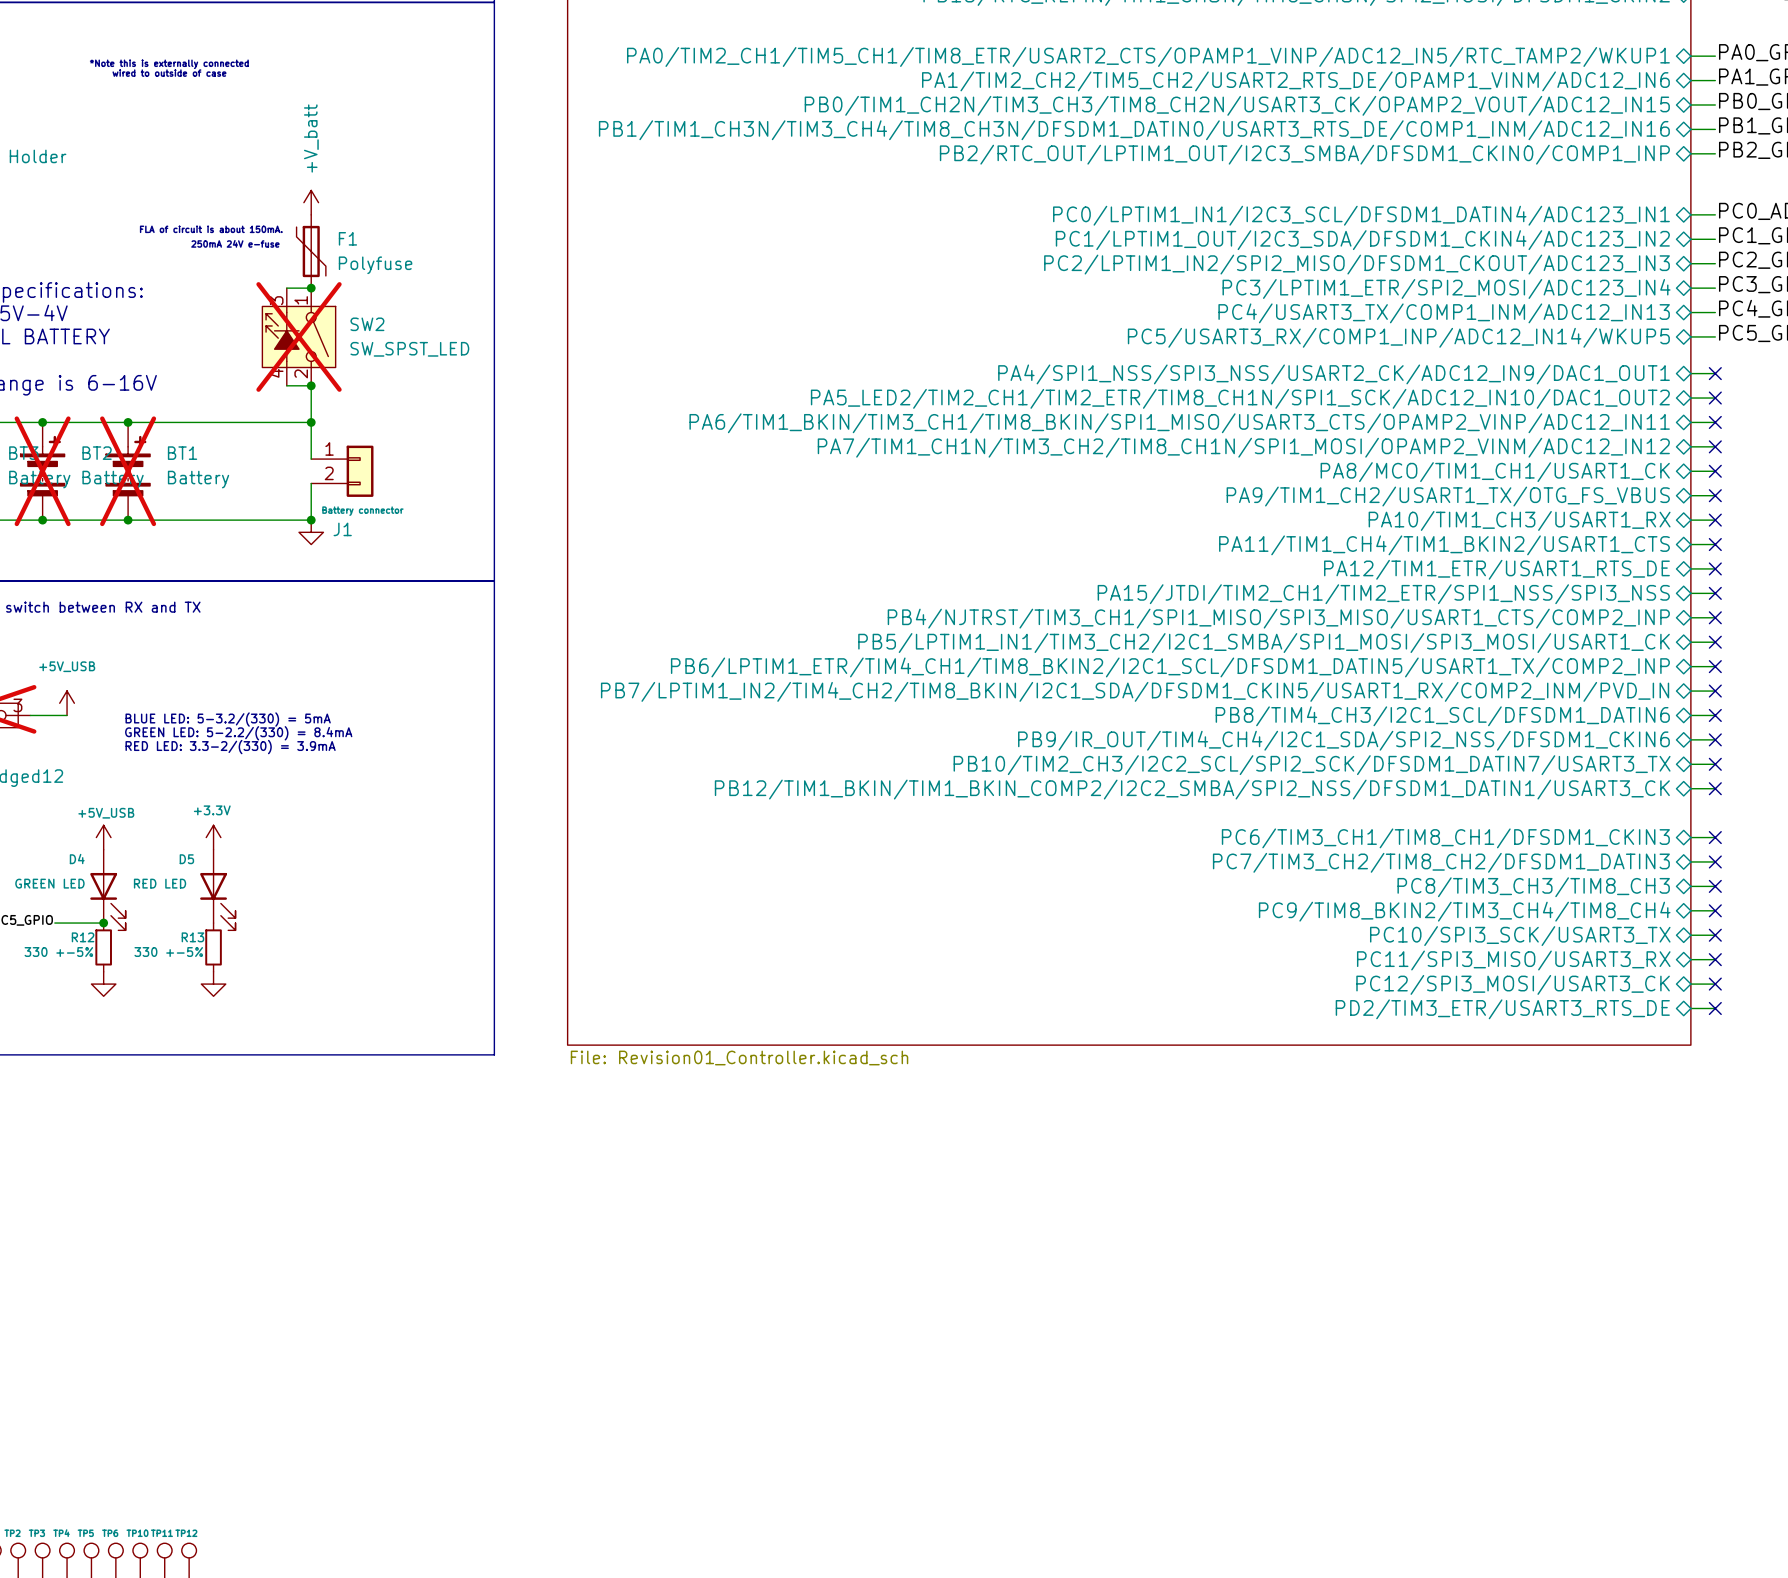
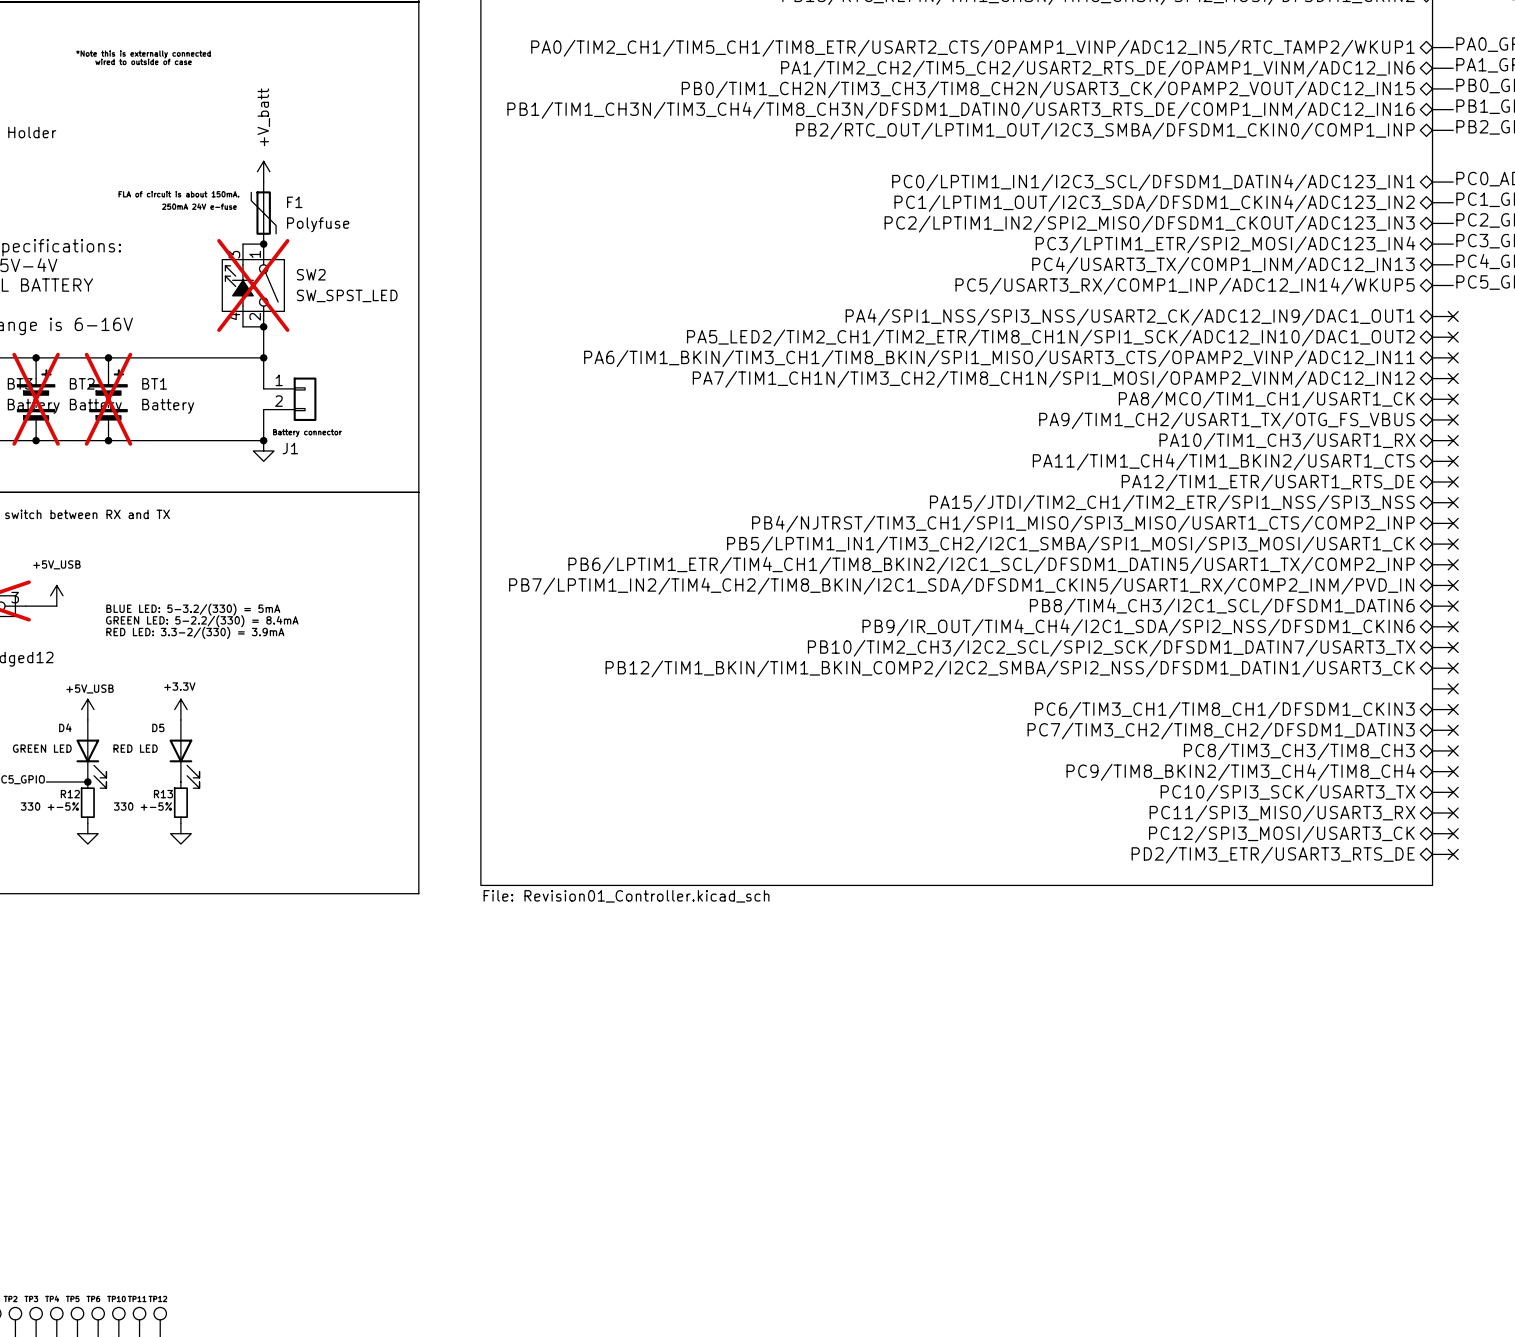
wire: none -> (1432, 688) (1453, 688)
no-connect mark: none -> (1453, 688)

